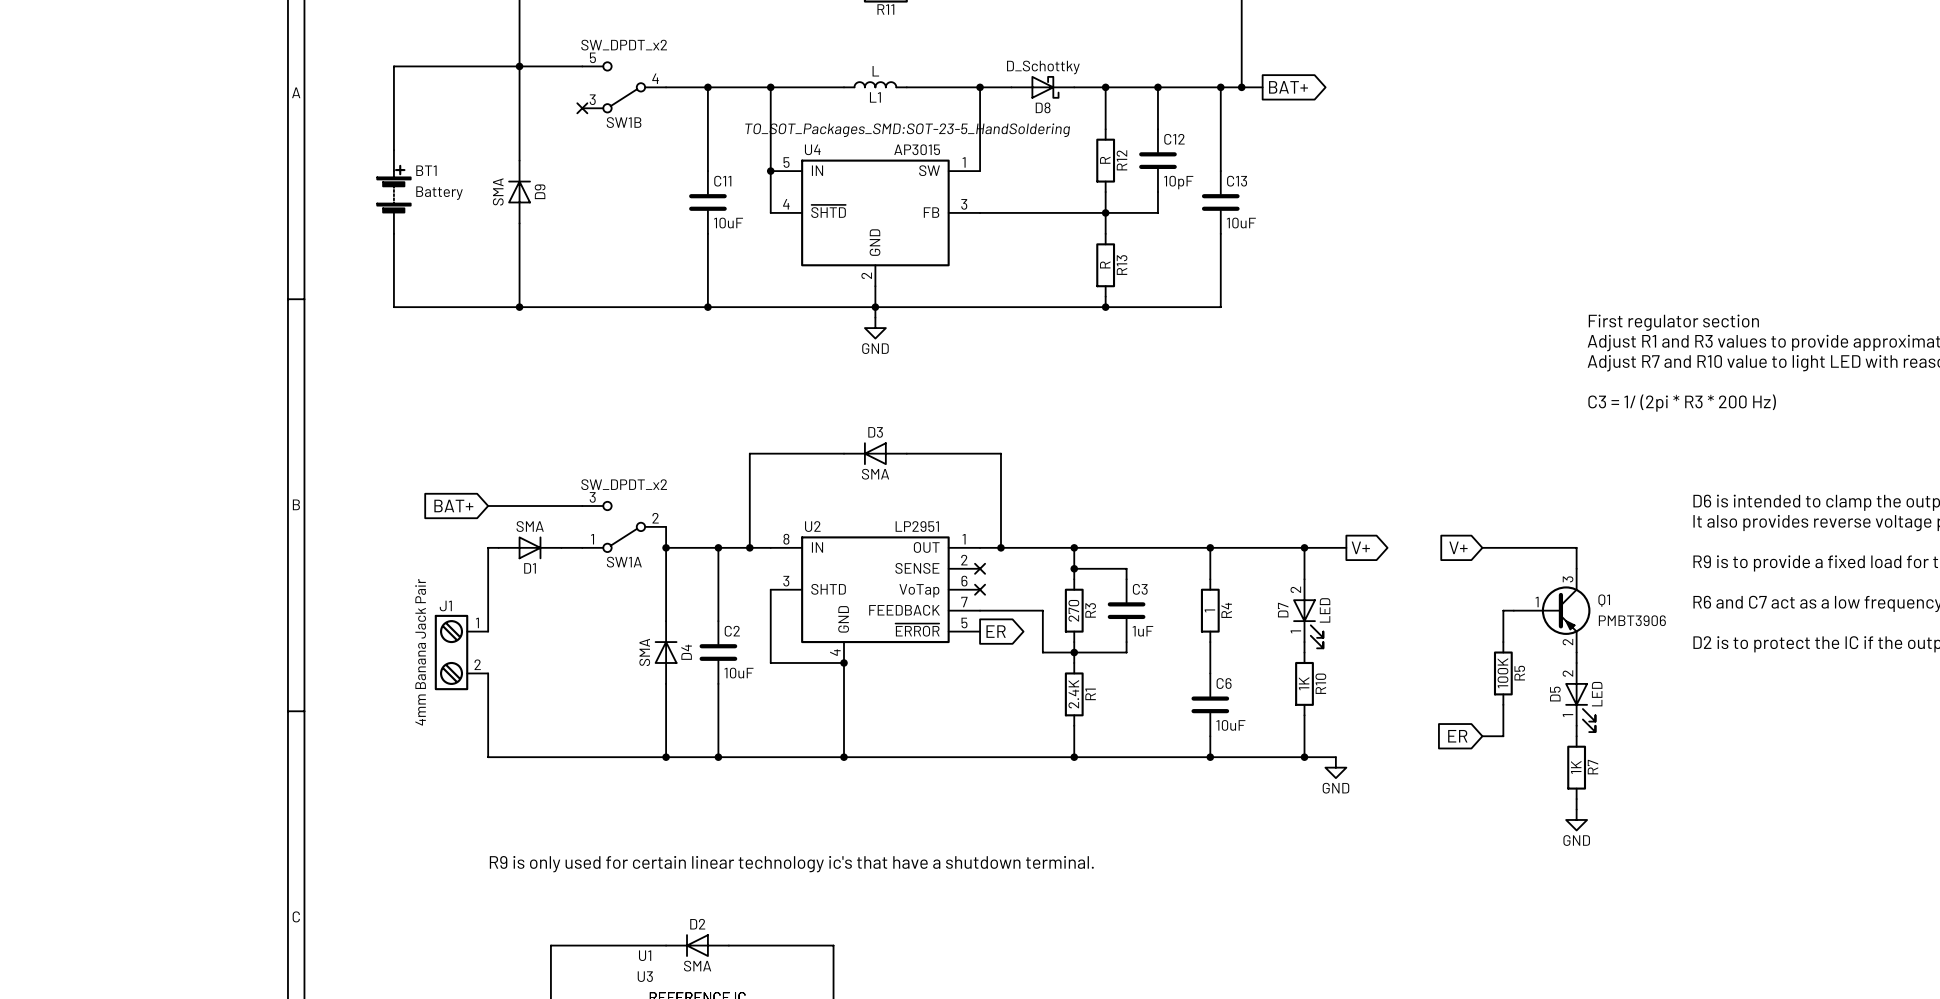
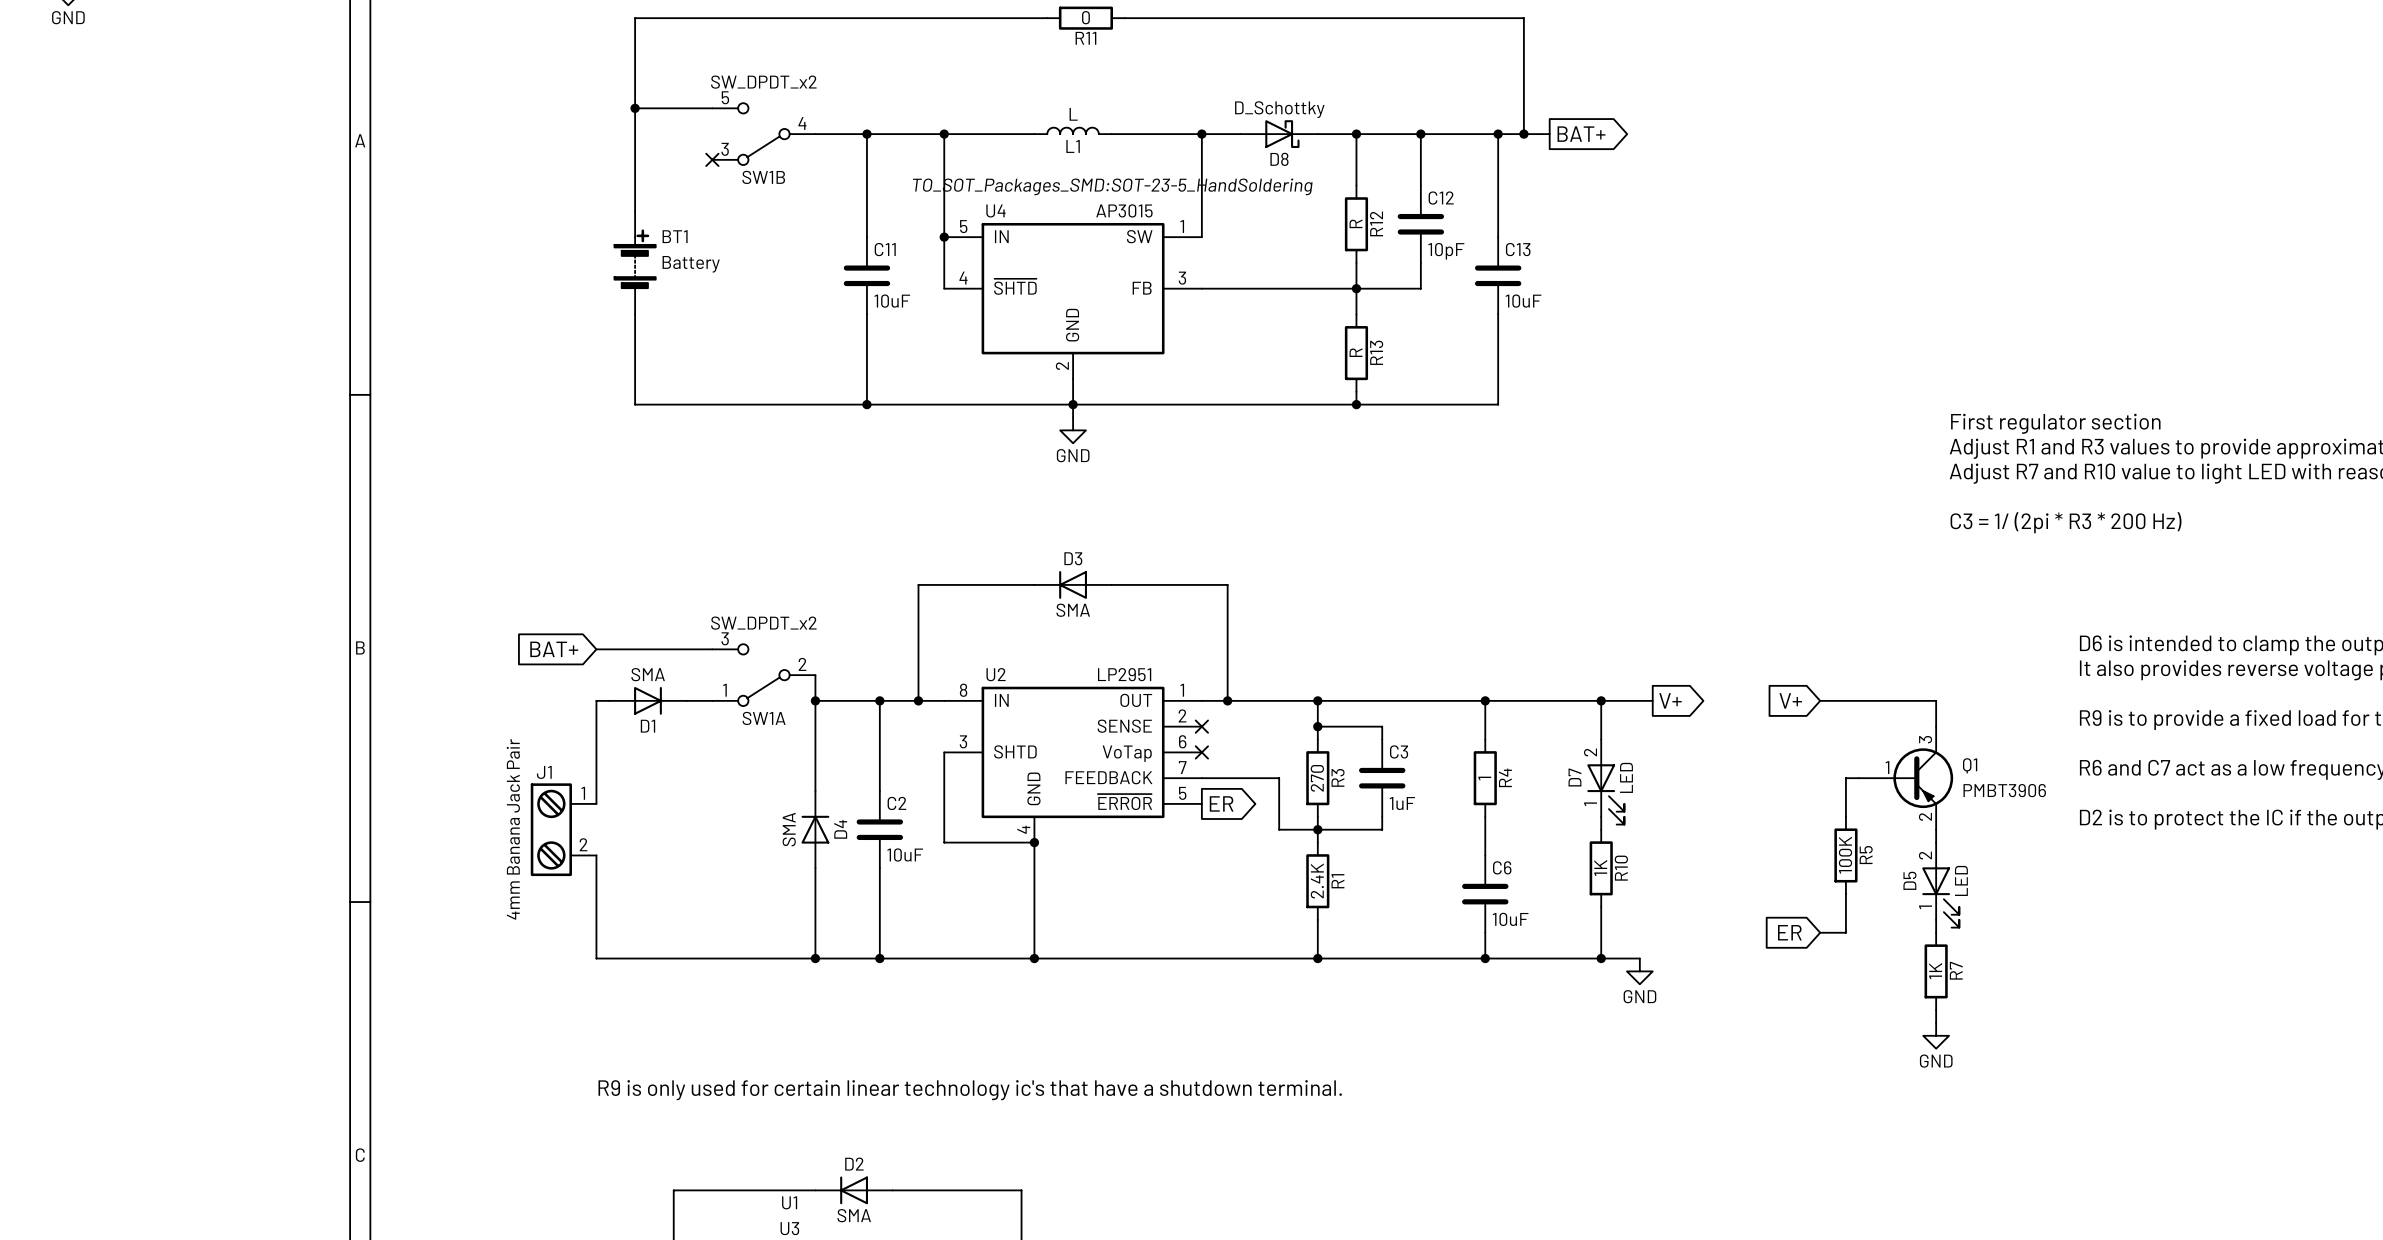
wire: (519, 66) (393, 66) (393, 150) -> none
BT1 position: (393, 192) -> (635, 262)
D9: SMA (519, 192) -> none
wire: (393, 233) (393, 307) (519, 307) -> none
junction: (519, 307) -> none

